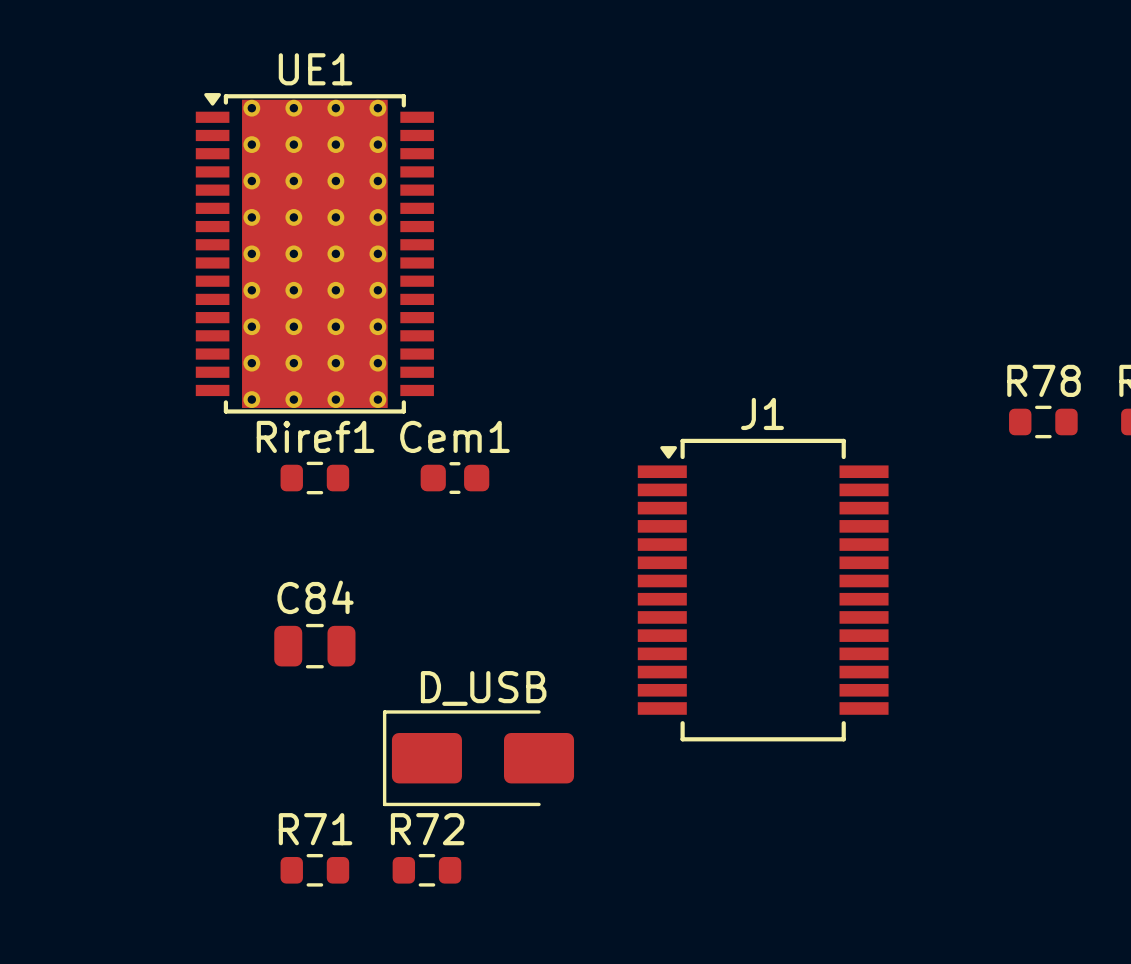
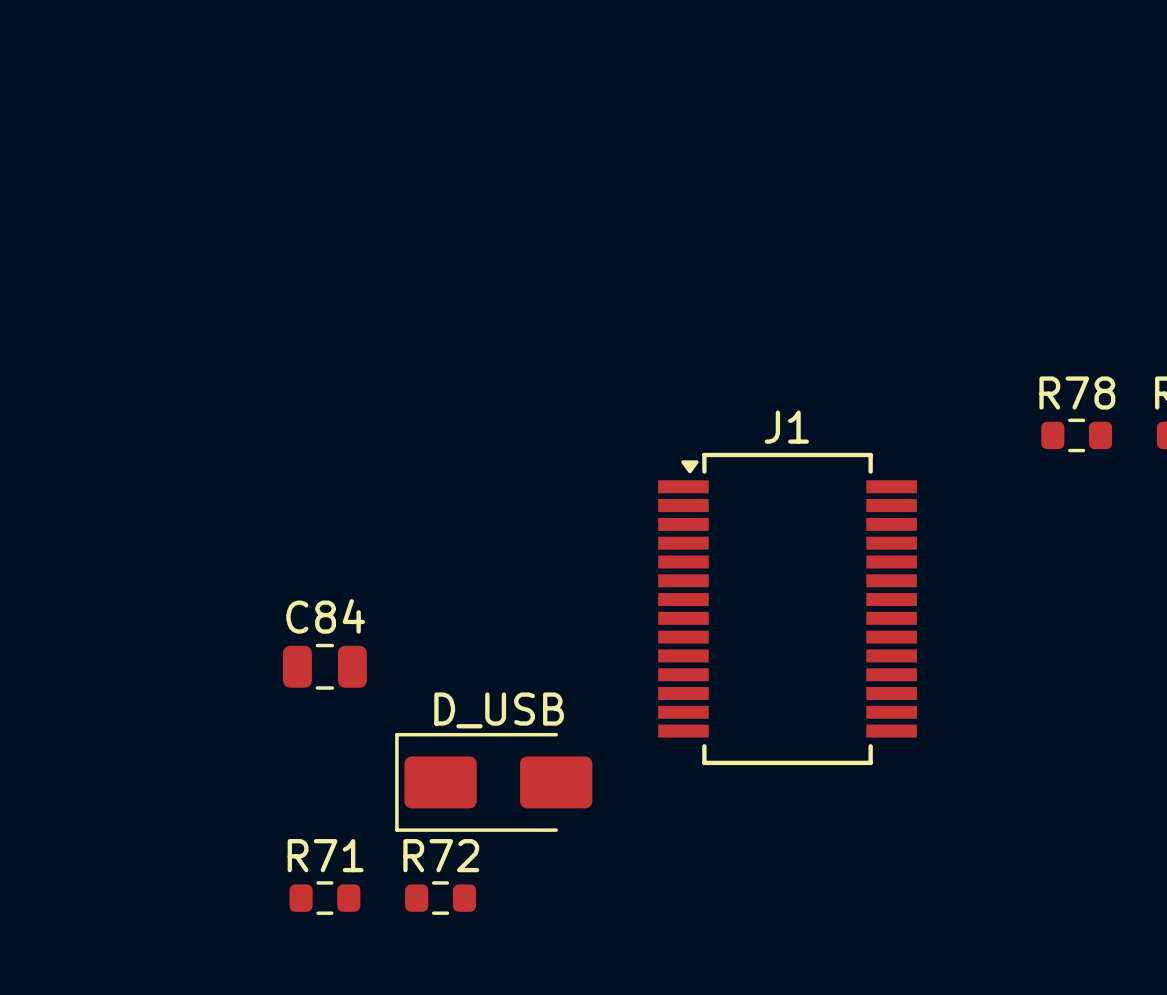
UE1: (314, 253) -> none
Riref1: (314, 478) -> none
Cem1: (454, 478) -> none

